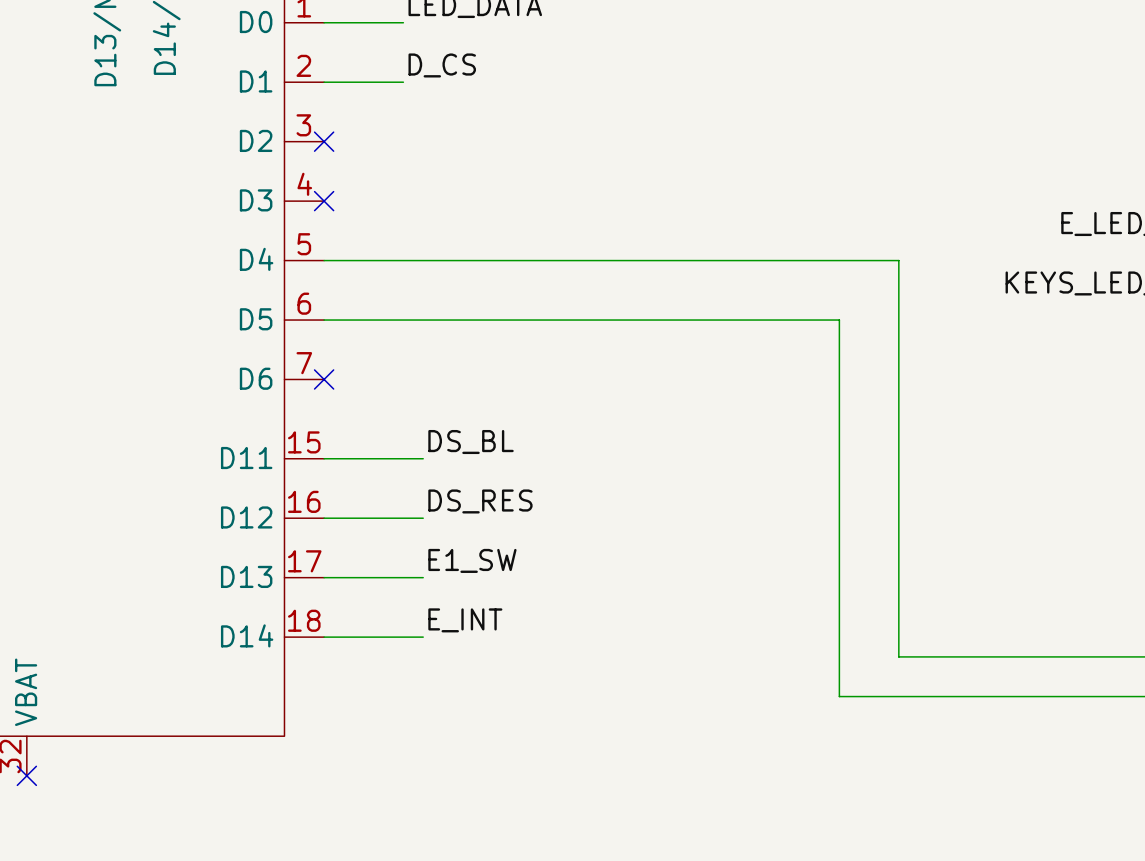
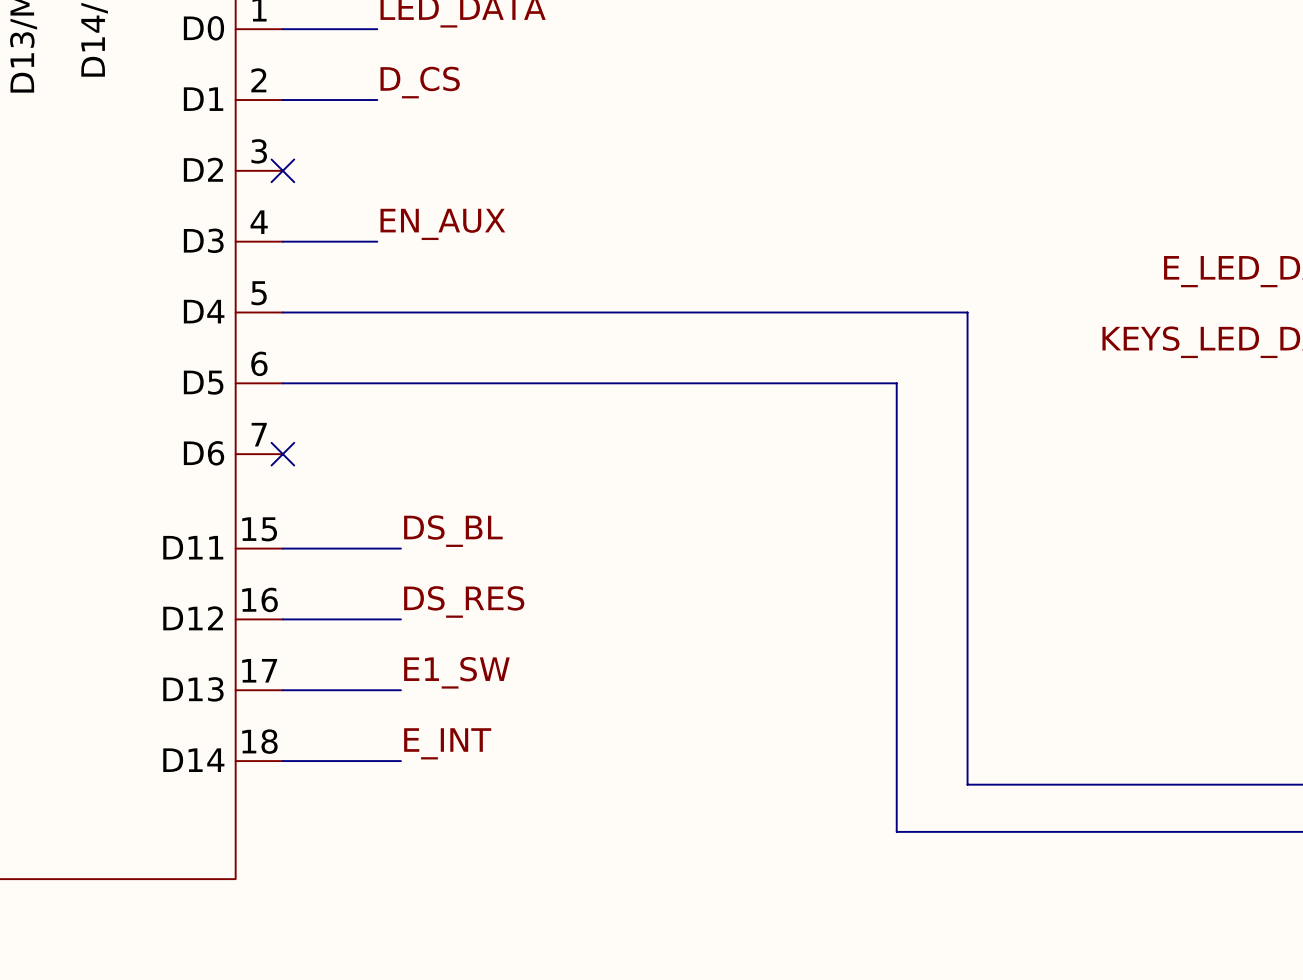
label: none -> EN_AUX (442, 224)
wire: none -> (282, 241) (377, 241)
no-connect mark: (324, 201) -> none

